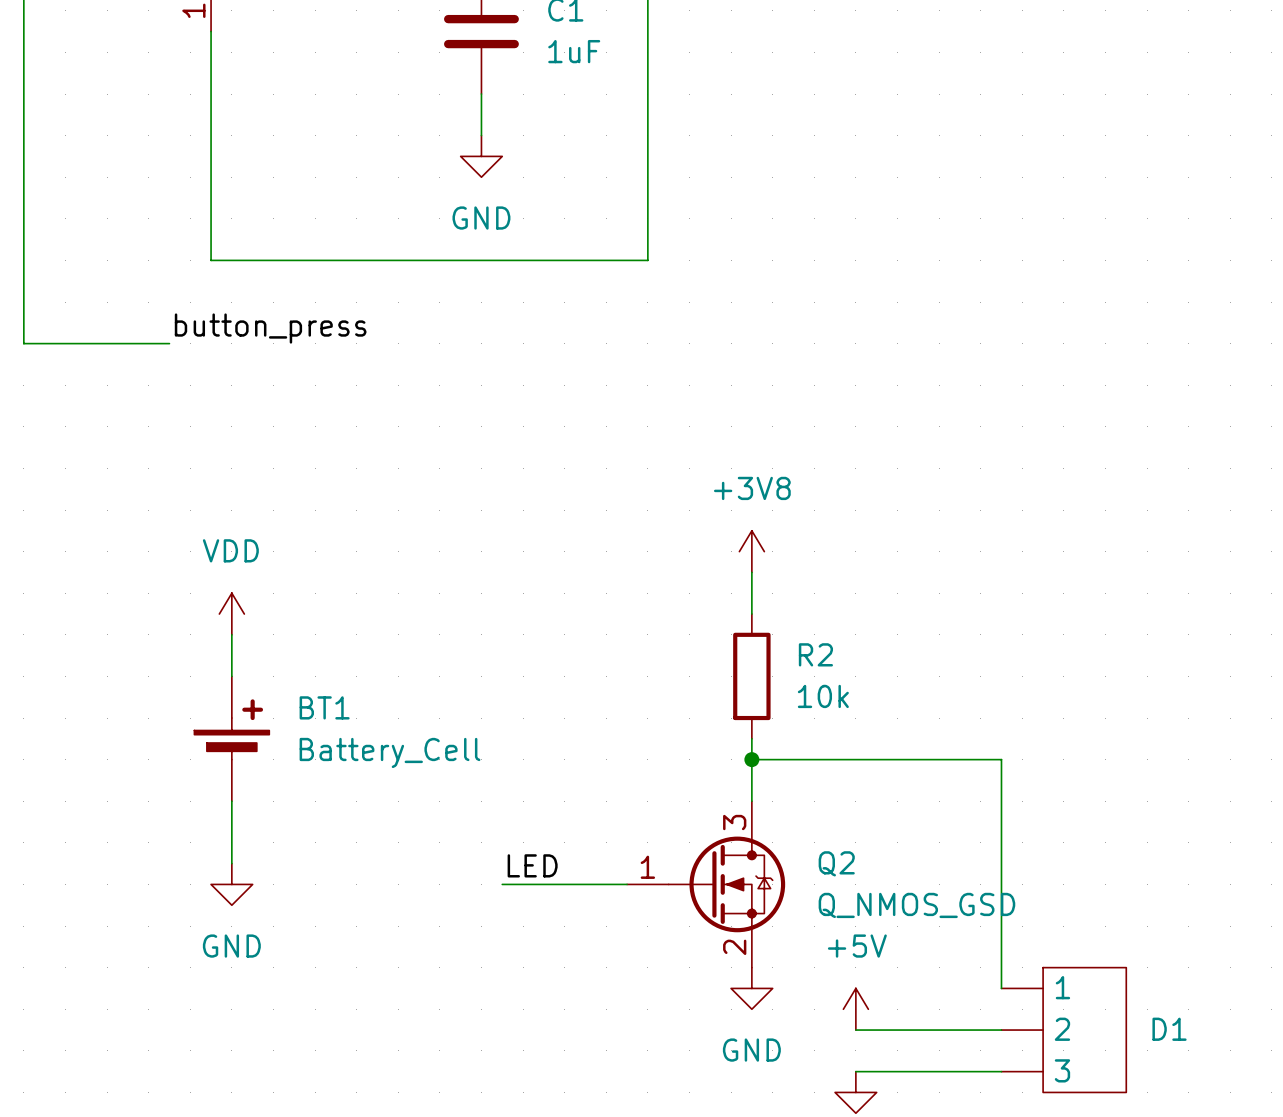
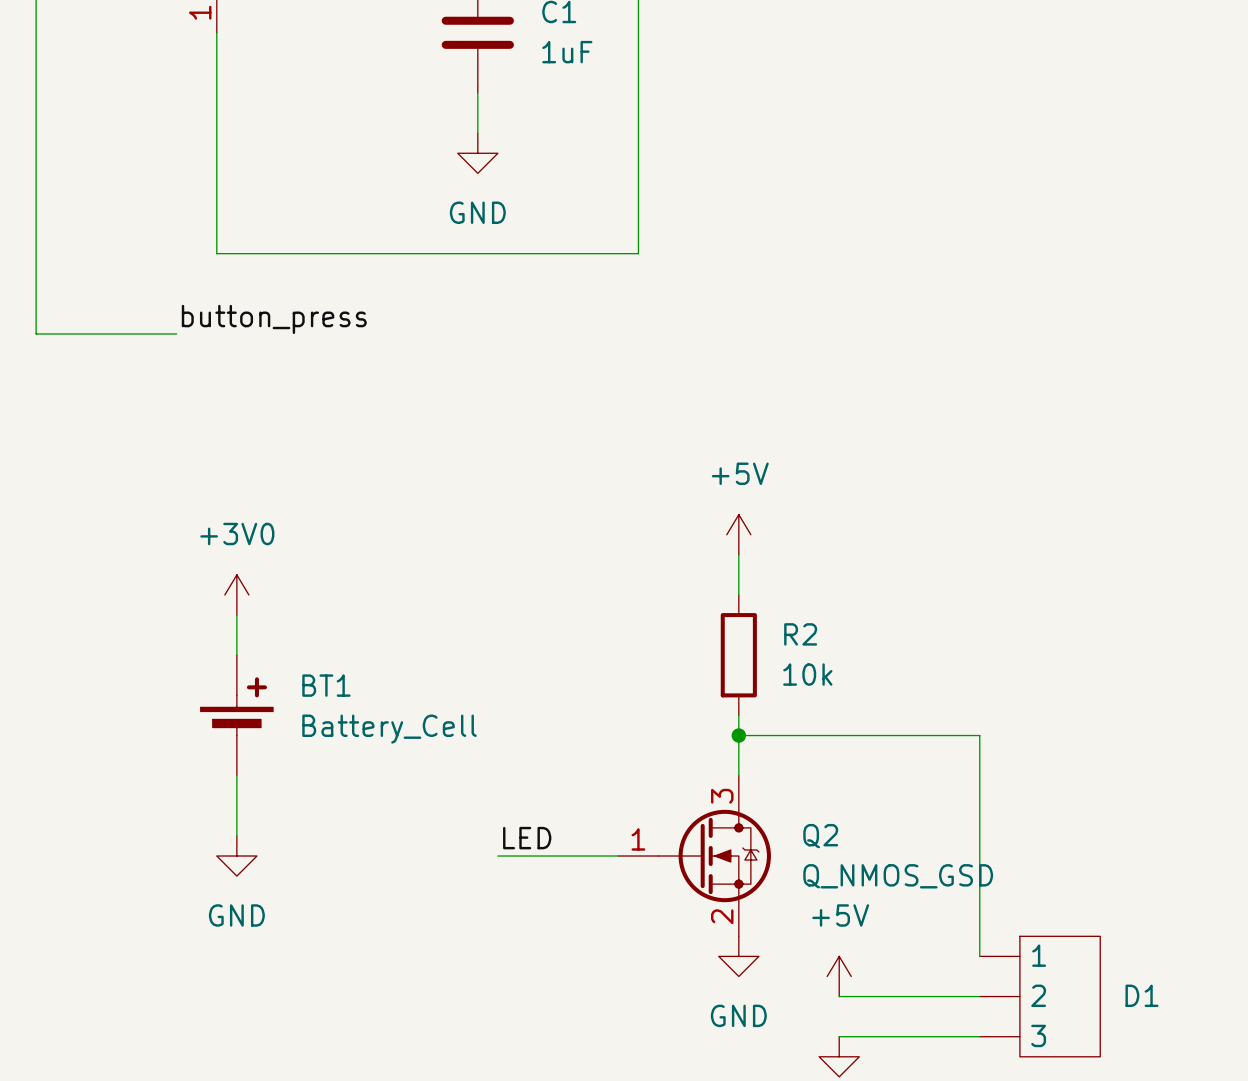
power symbol: +3V8 (751, 551) -> +5V (738, 534)
power symbol: VDD (231, 614) -> +3V0 (236, 594)

